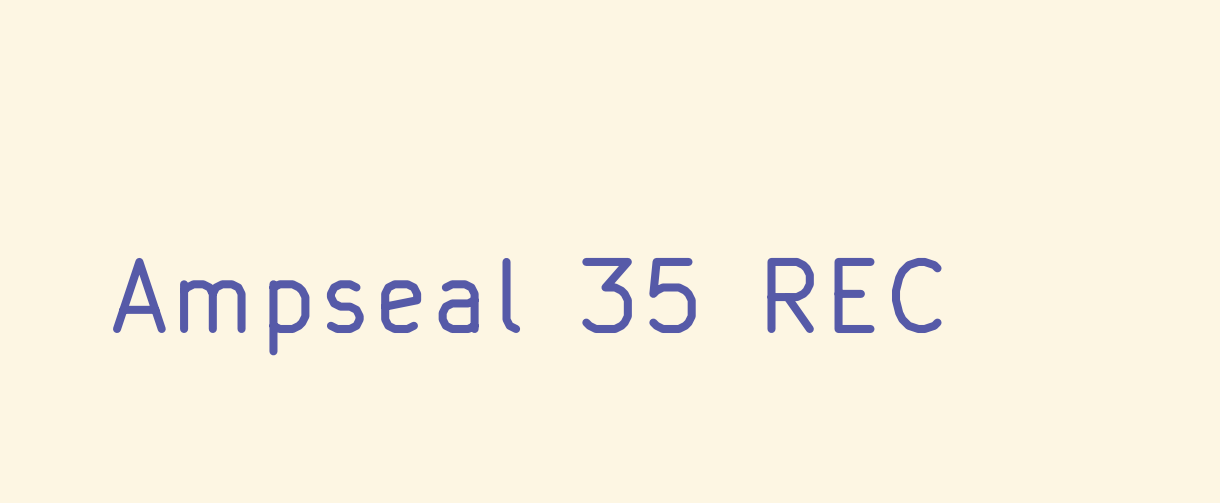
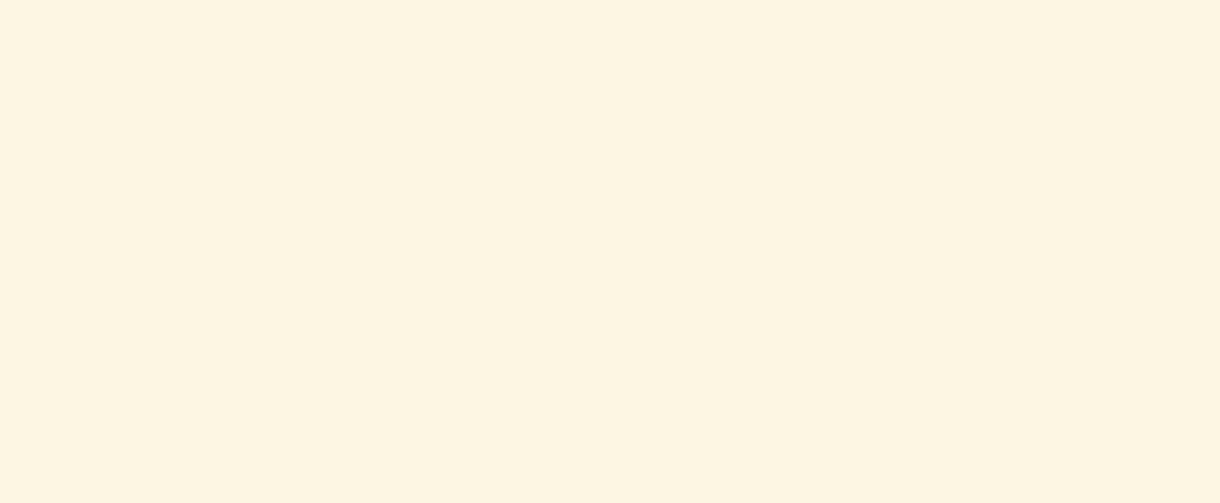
text: Ampseal 35 REC (527, 306) -> none

